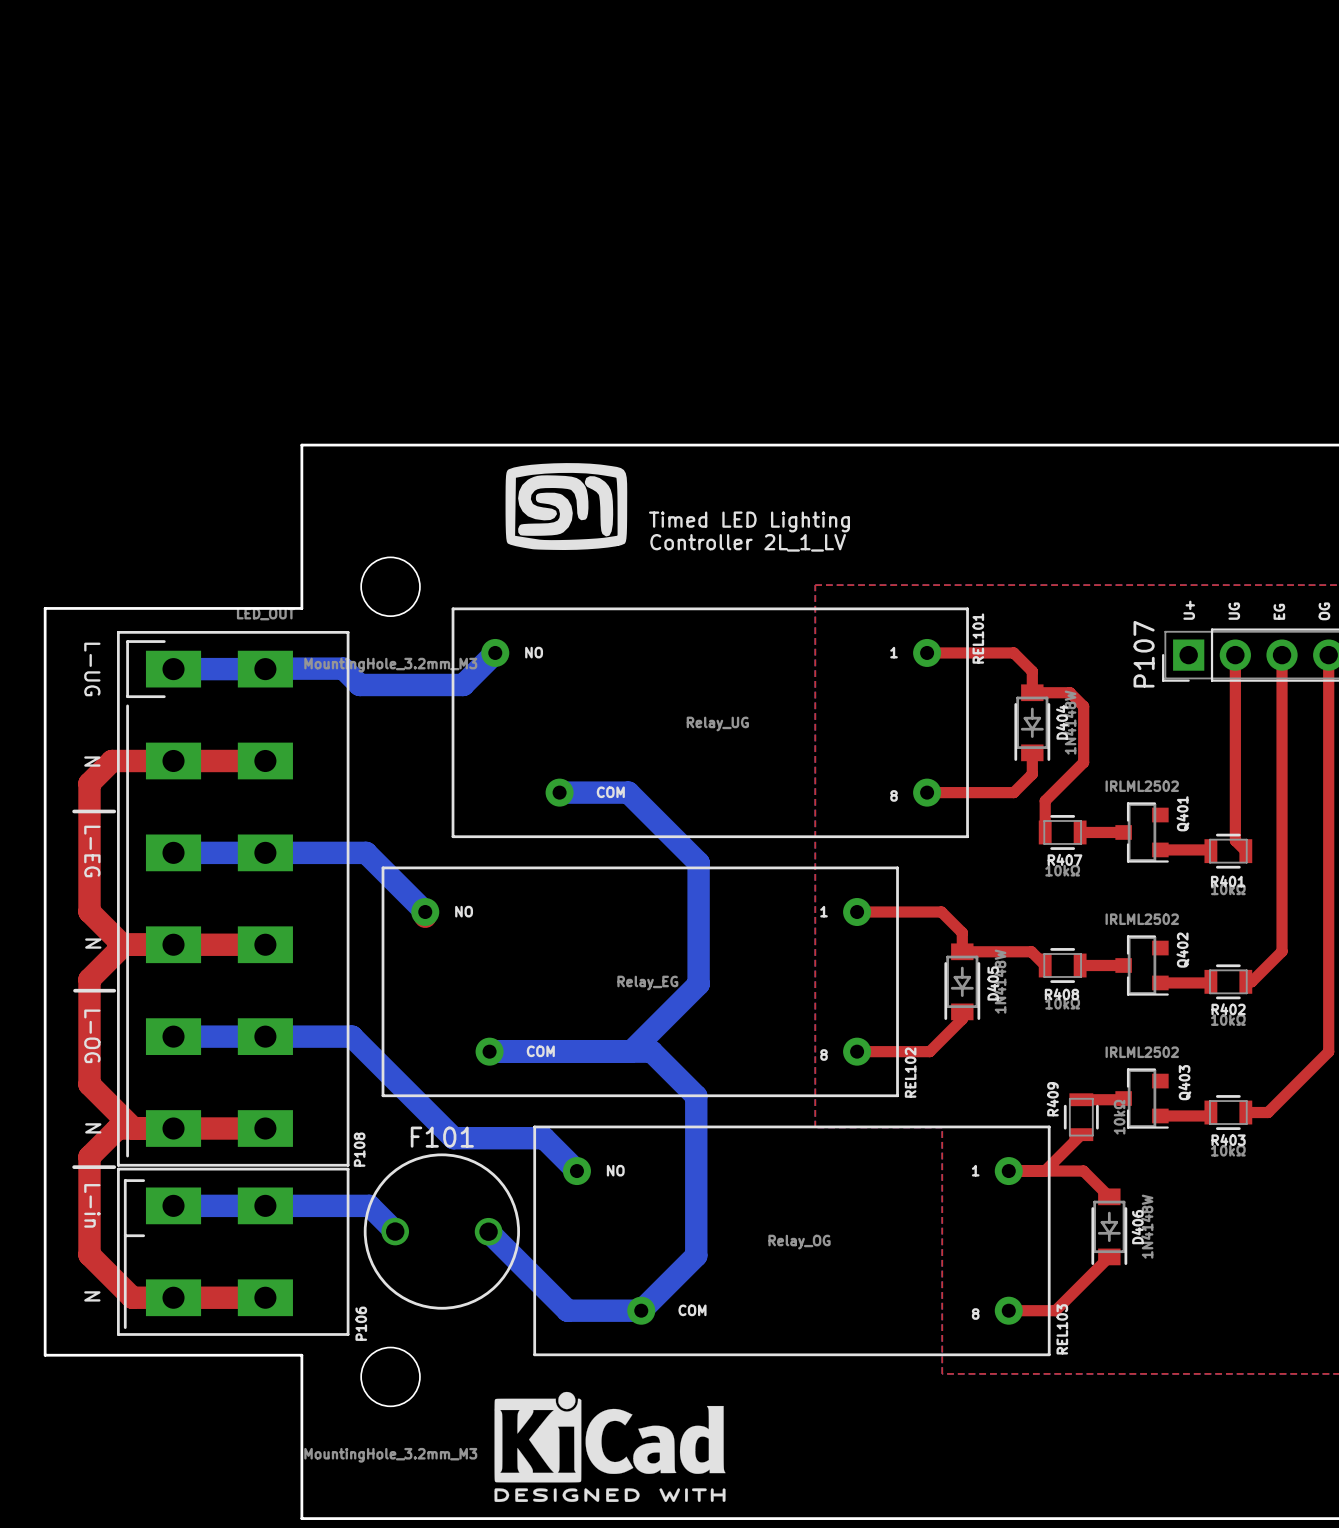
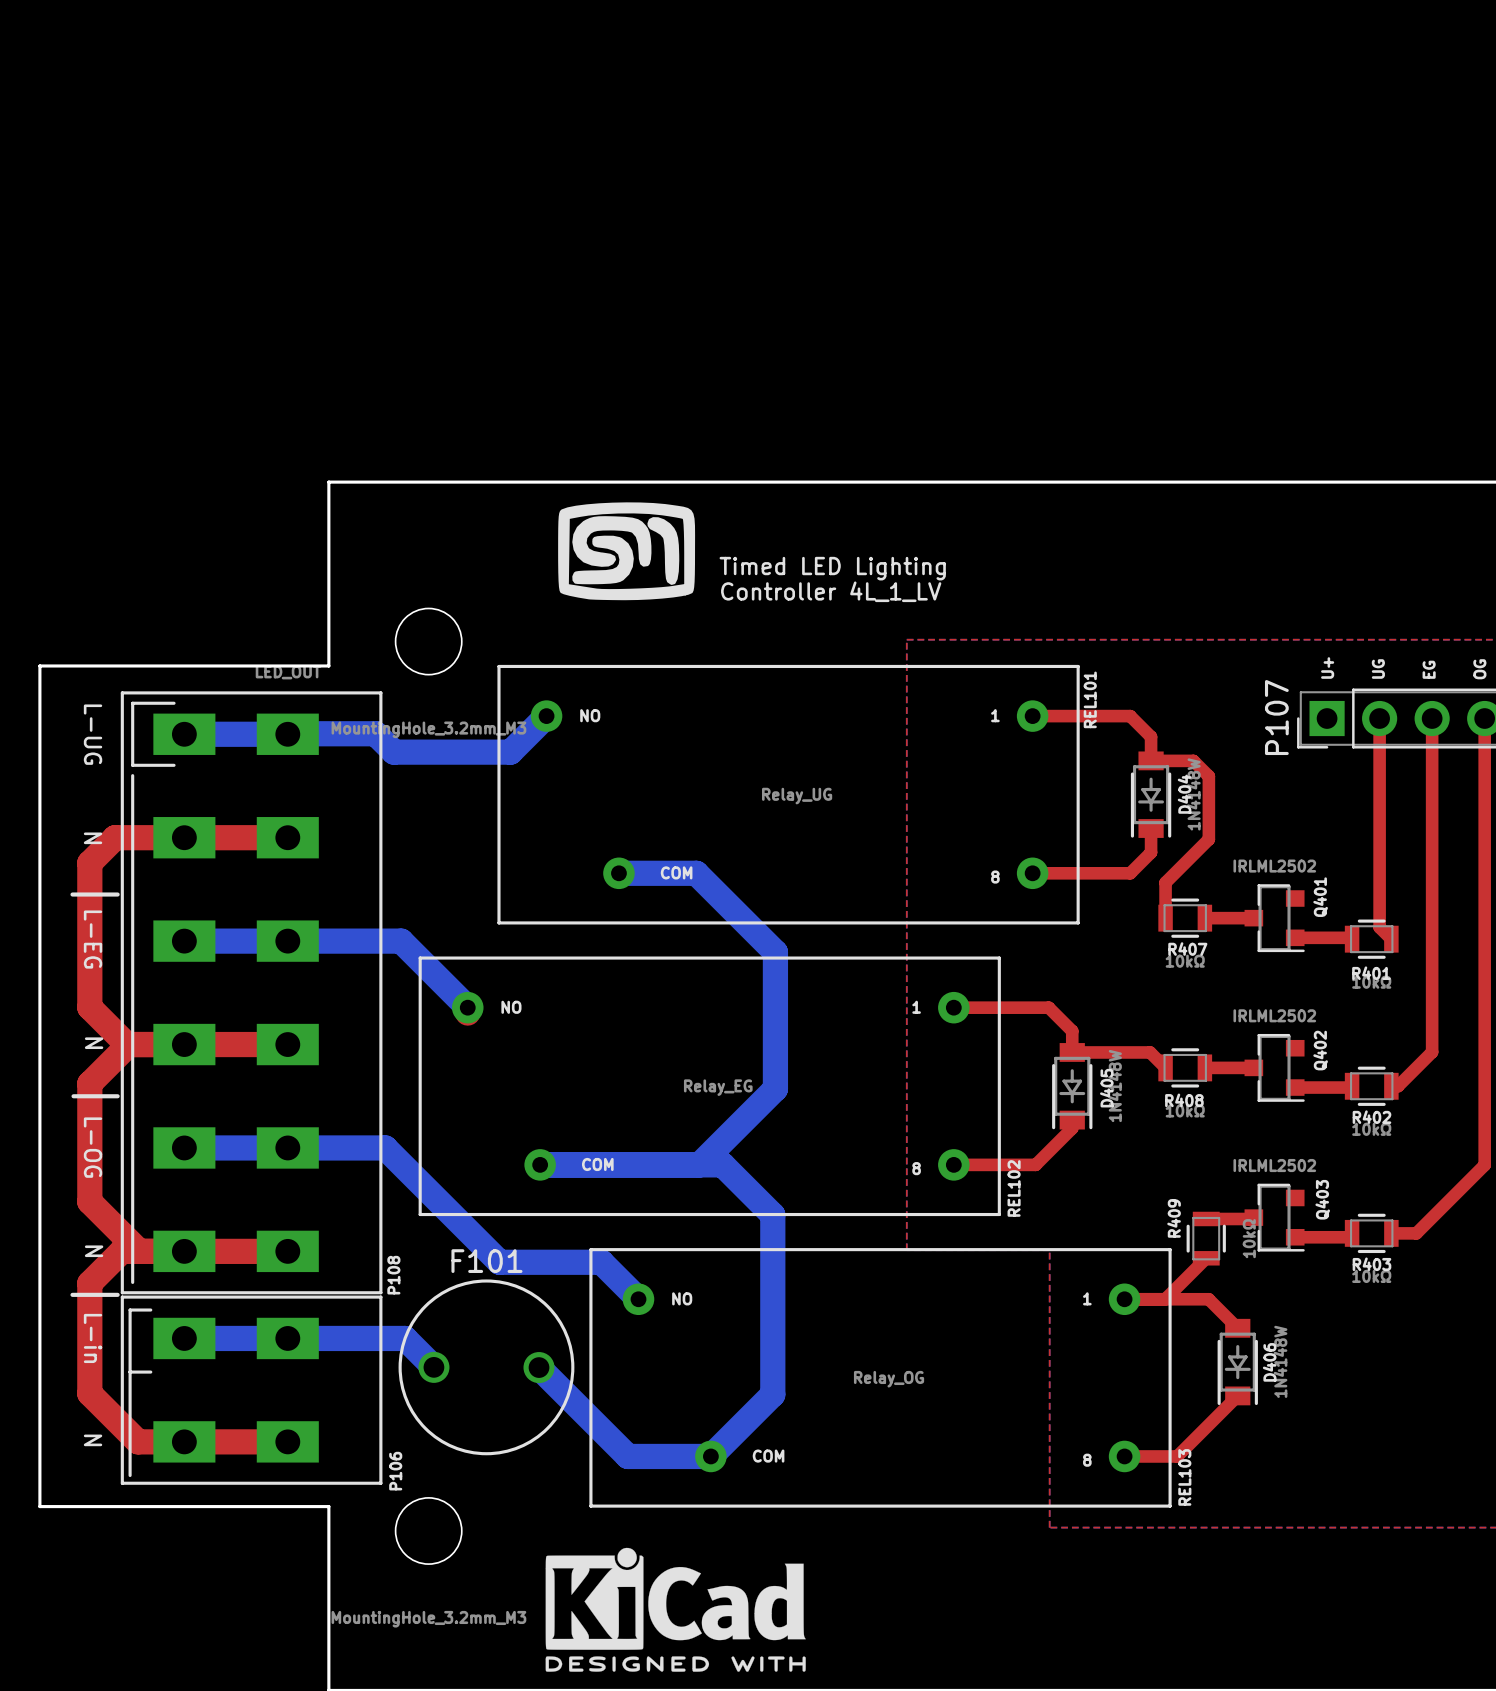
text: Controller 2L_1_LV (748, 542) -> Controller 4L_1_LV (831, 591)

